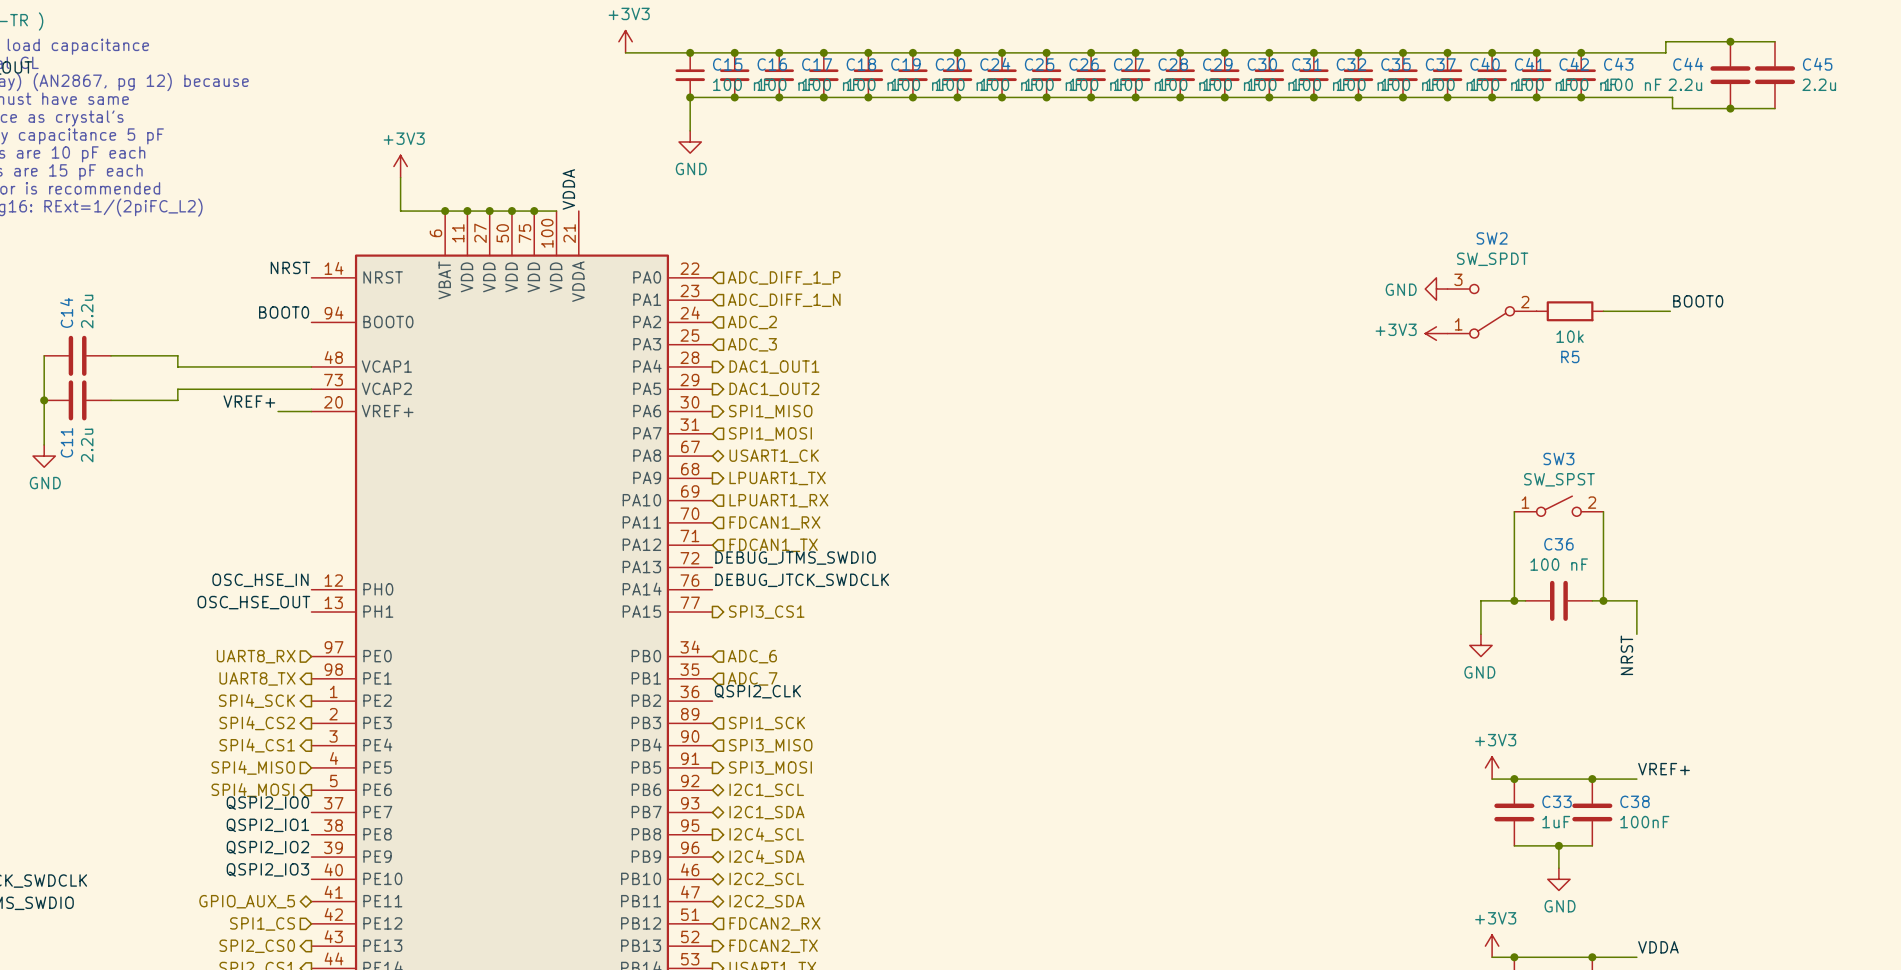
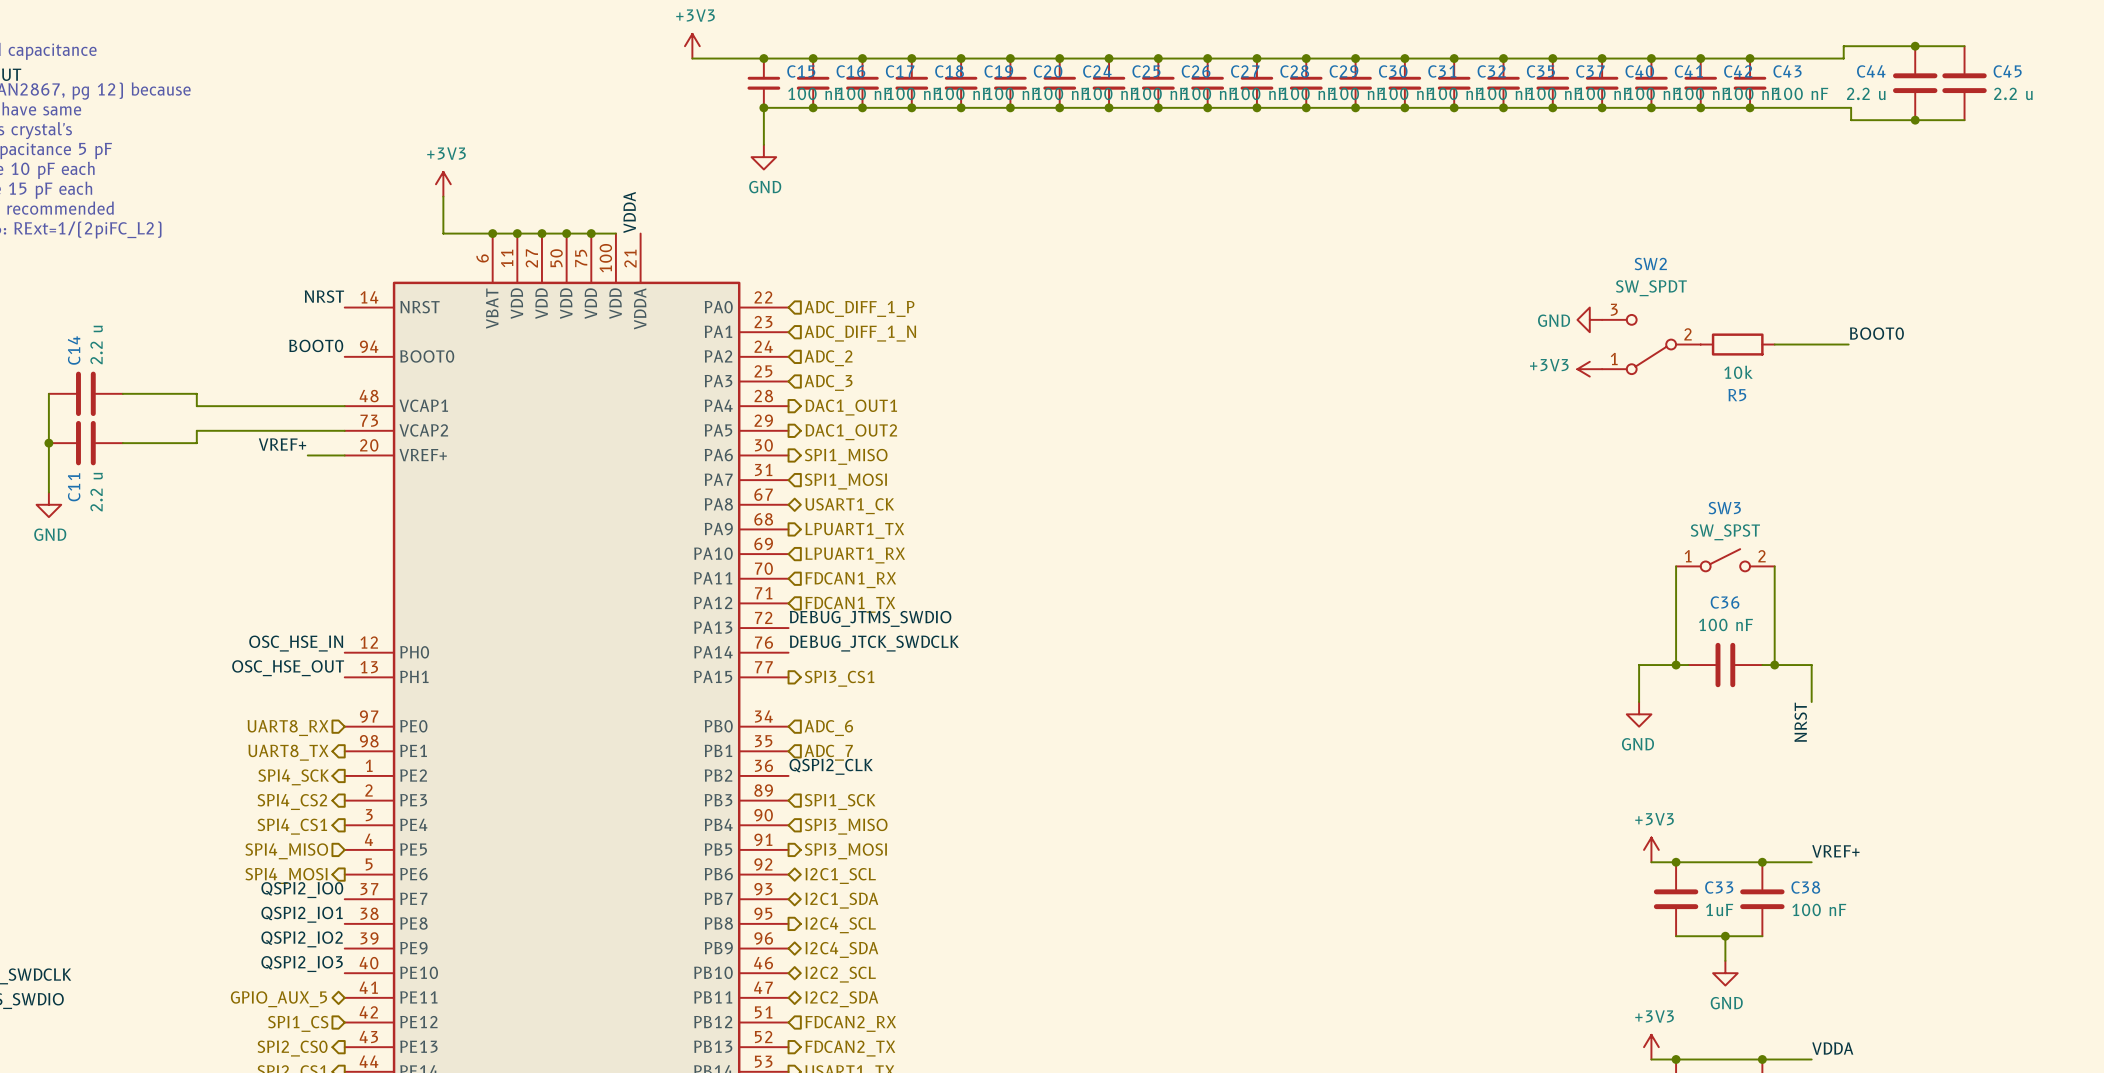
C44 value: 2.2u (1685, 84) -> 2.2 u (1866, 93)
C45 value: 2.2u (1819, 84) -> 2.2 u (2013, 93)
C14 value: 2.2u (87, 311) -> 2.2 u (96, 344)
C11 value: 2.2u (87, 445) -> 2.2 u (96, 492)
C38 value: 100nF (1644, 822) -> 100 nF (1819, 909)

